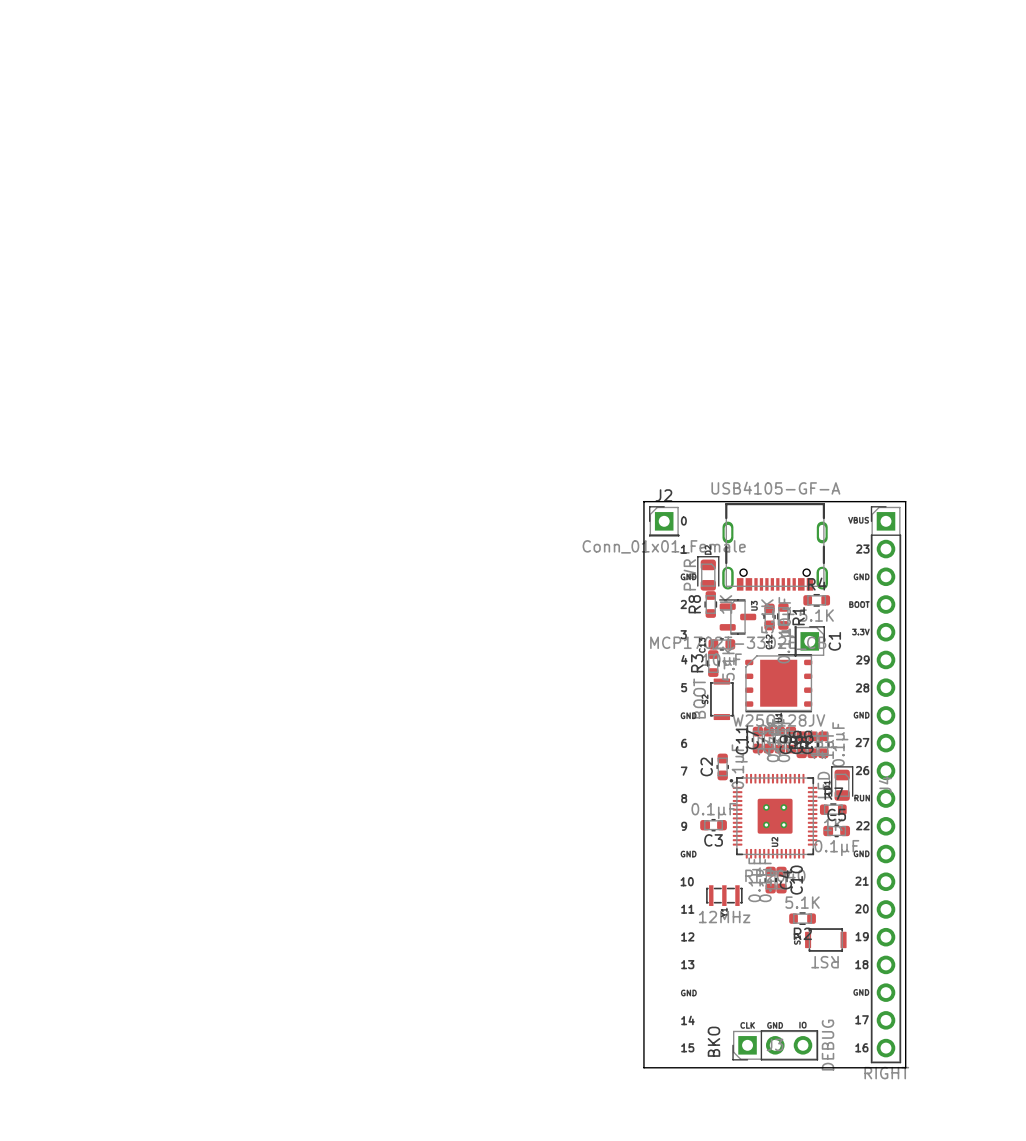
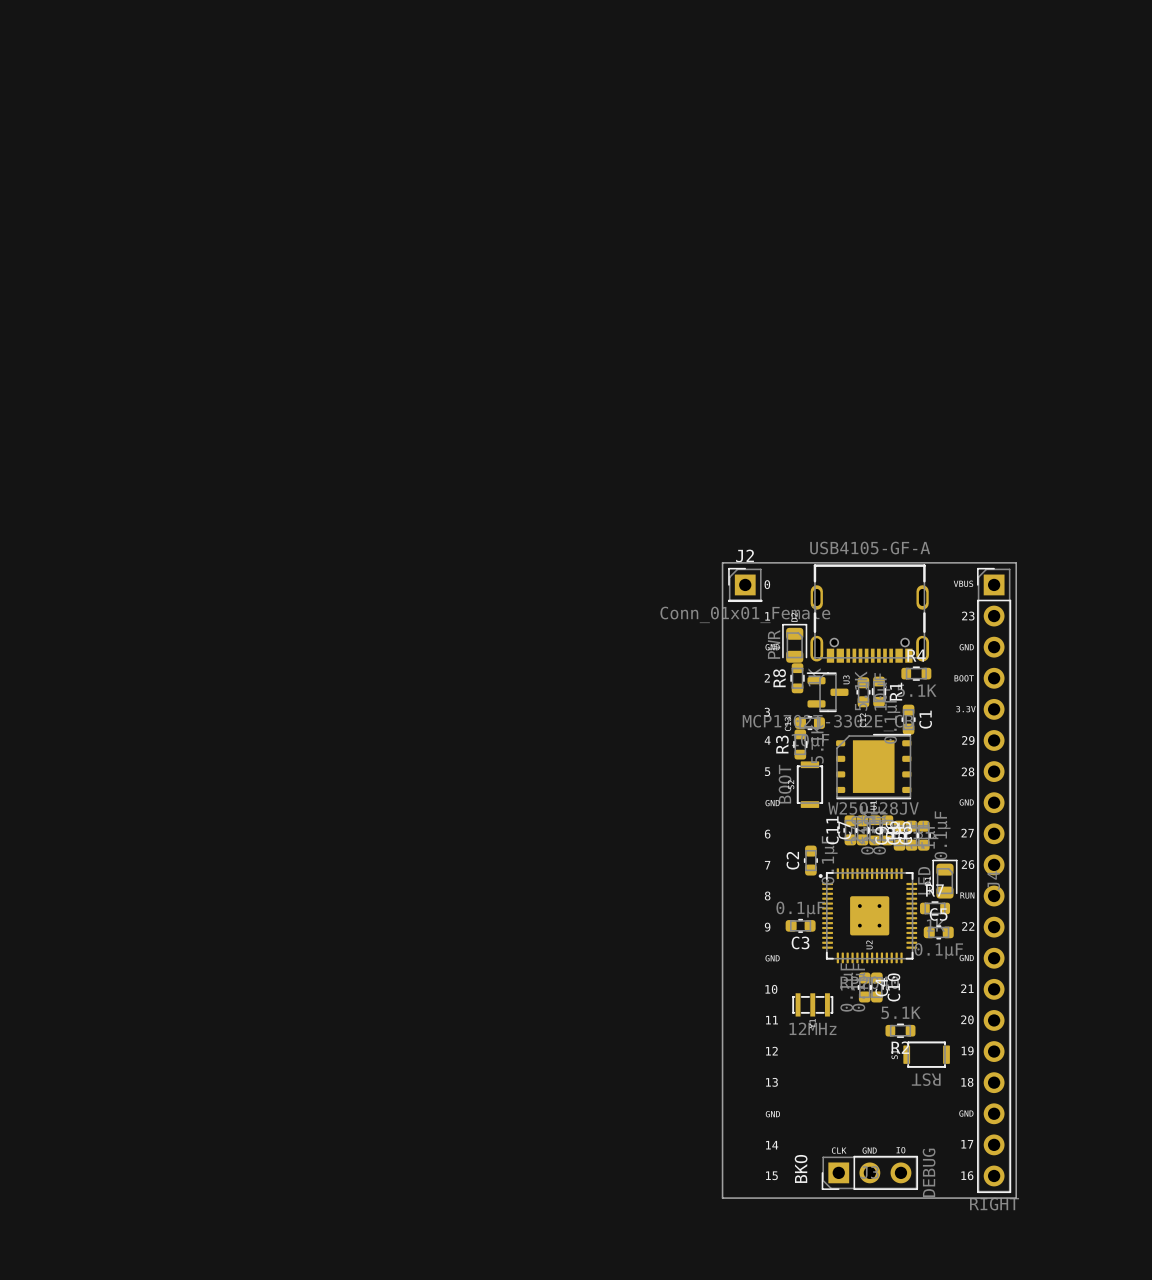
C1 footprint: [794, 626, 825, 657] -> [901, 704, 916, 735]

